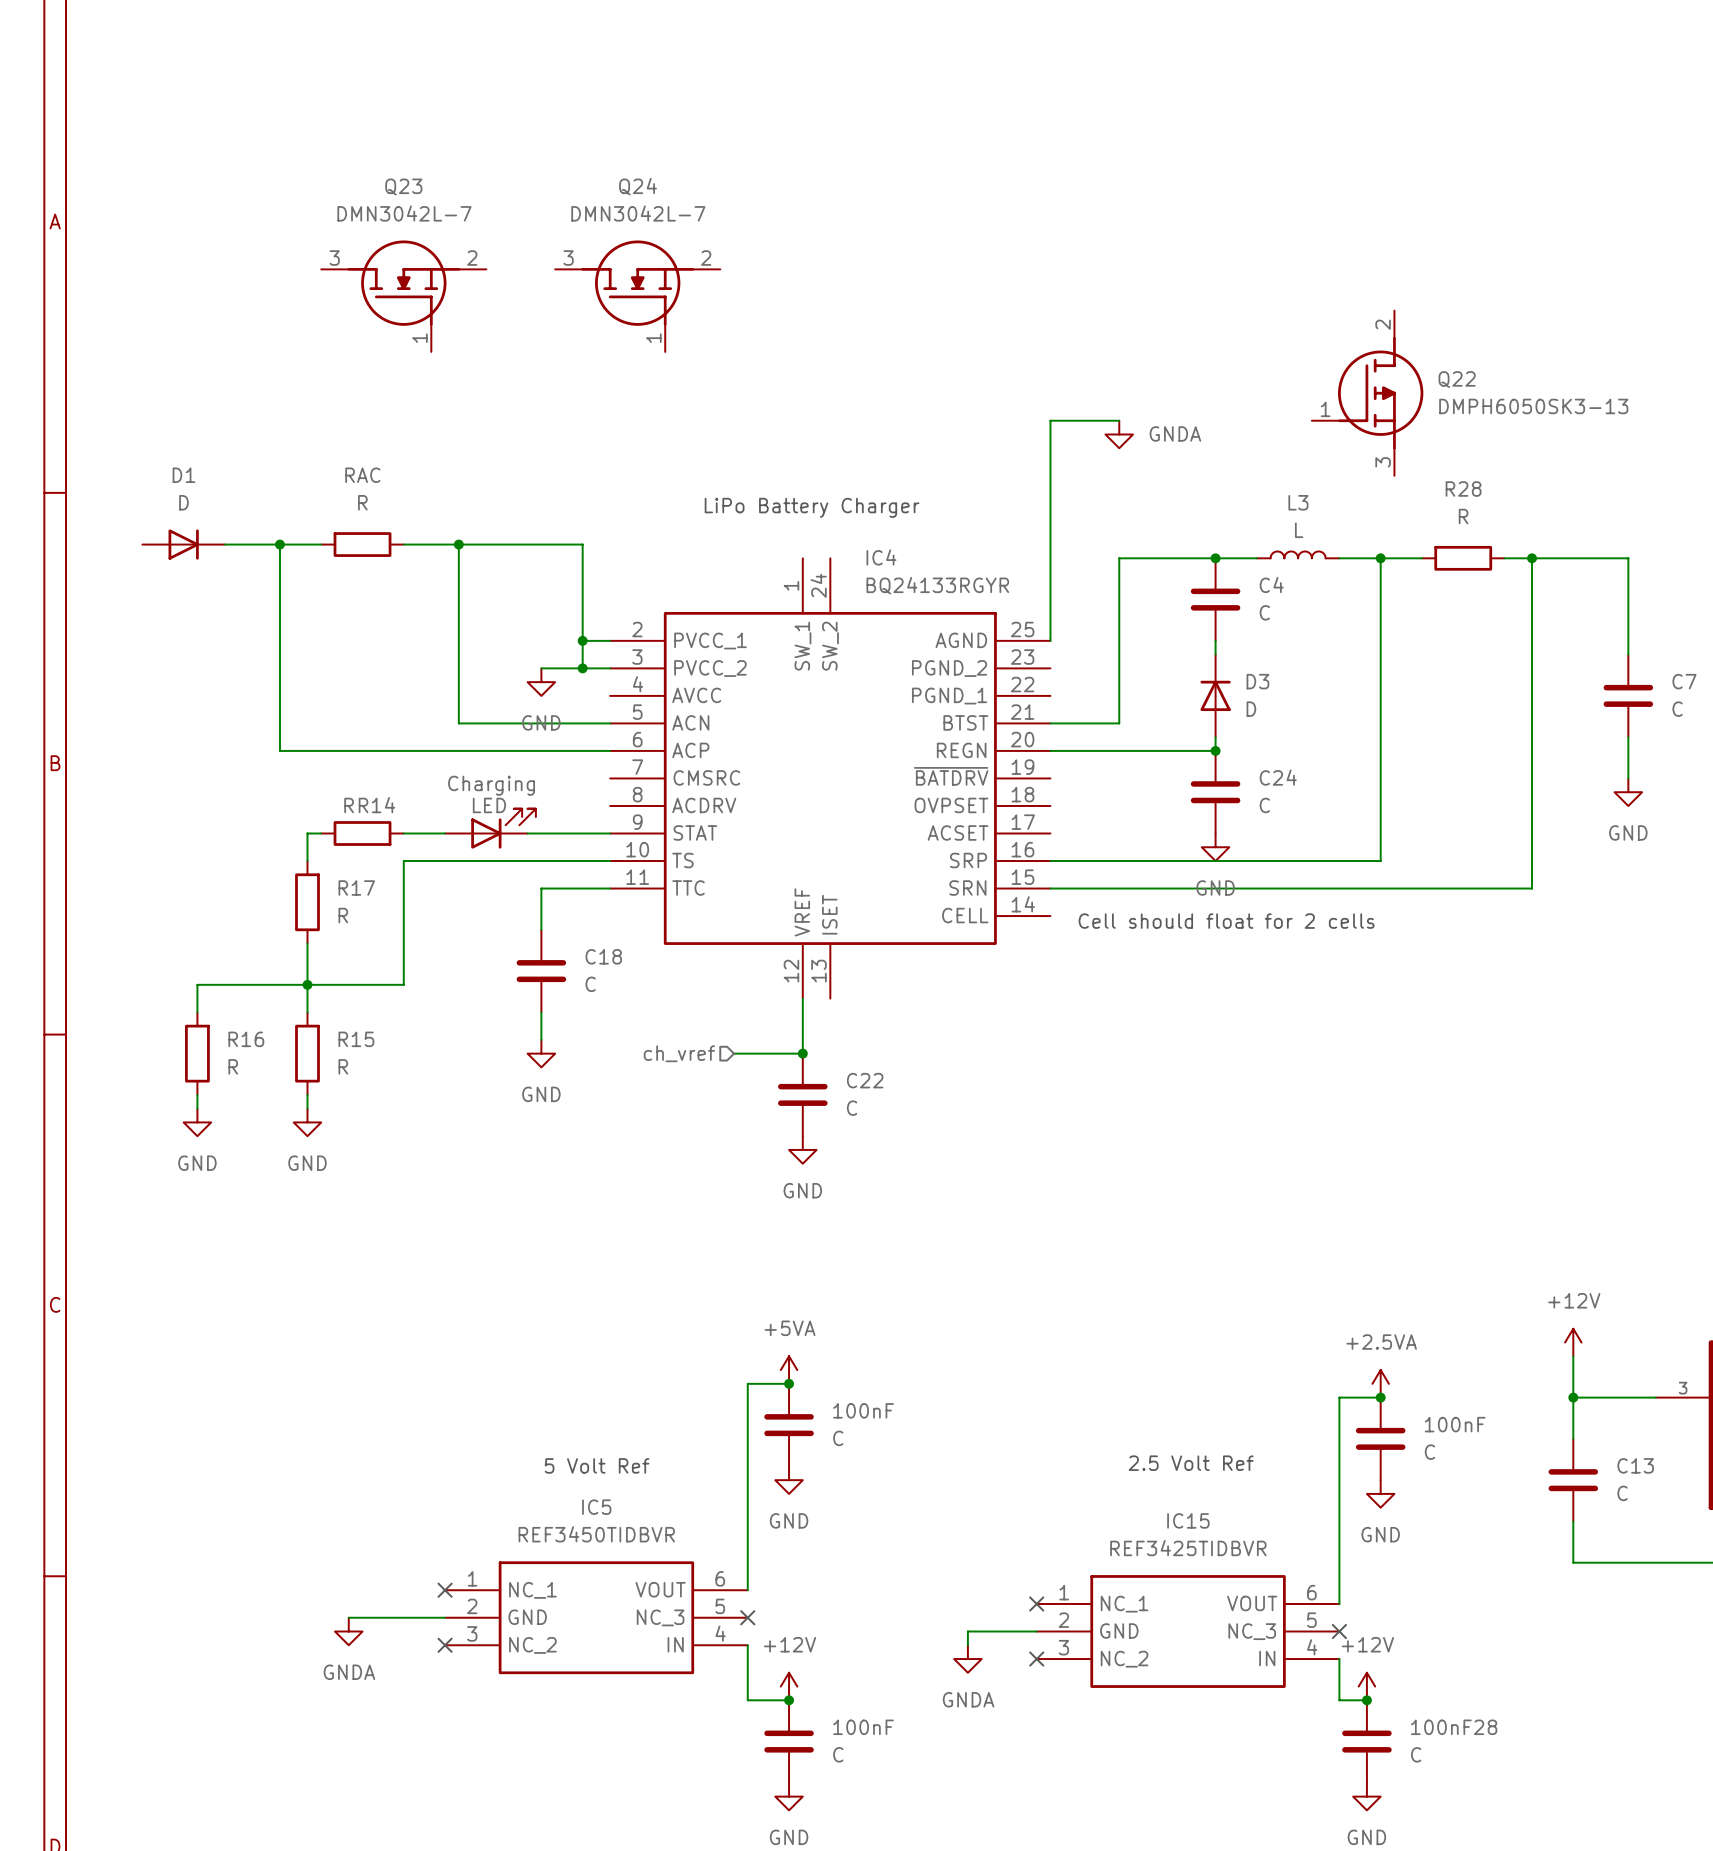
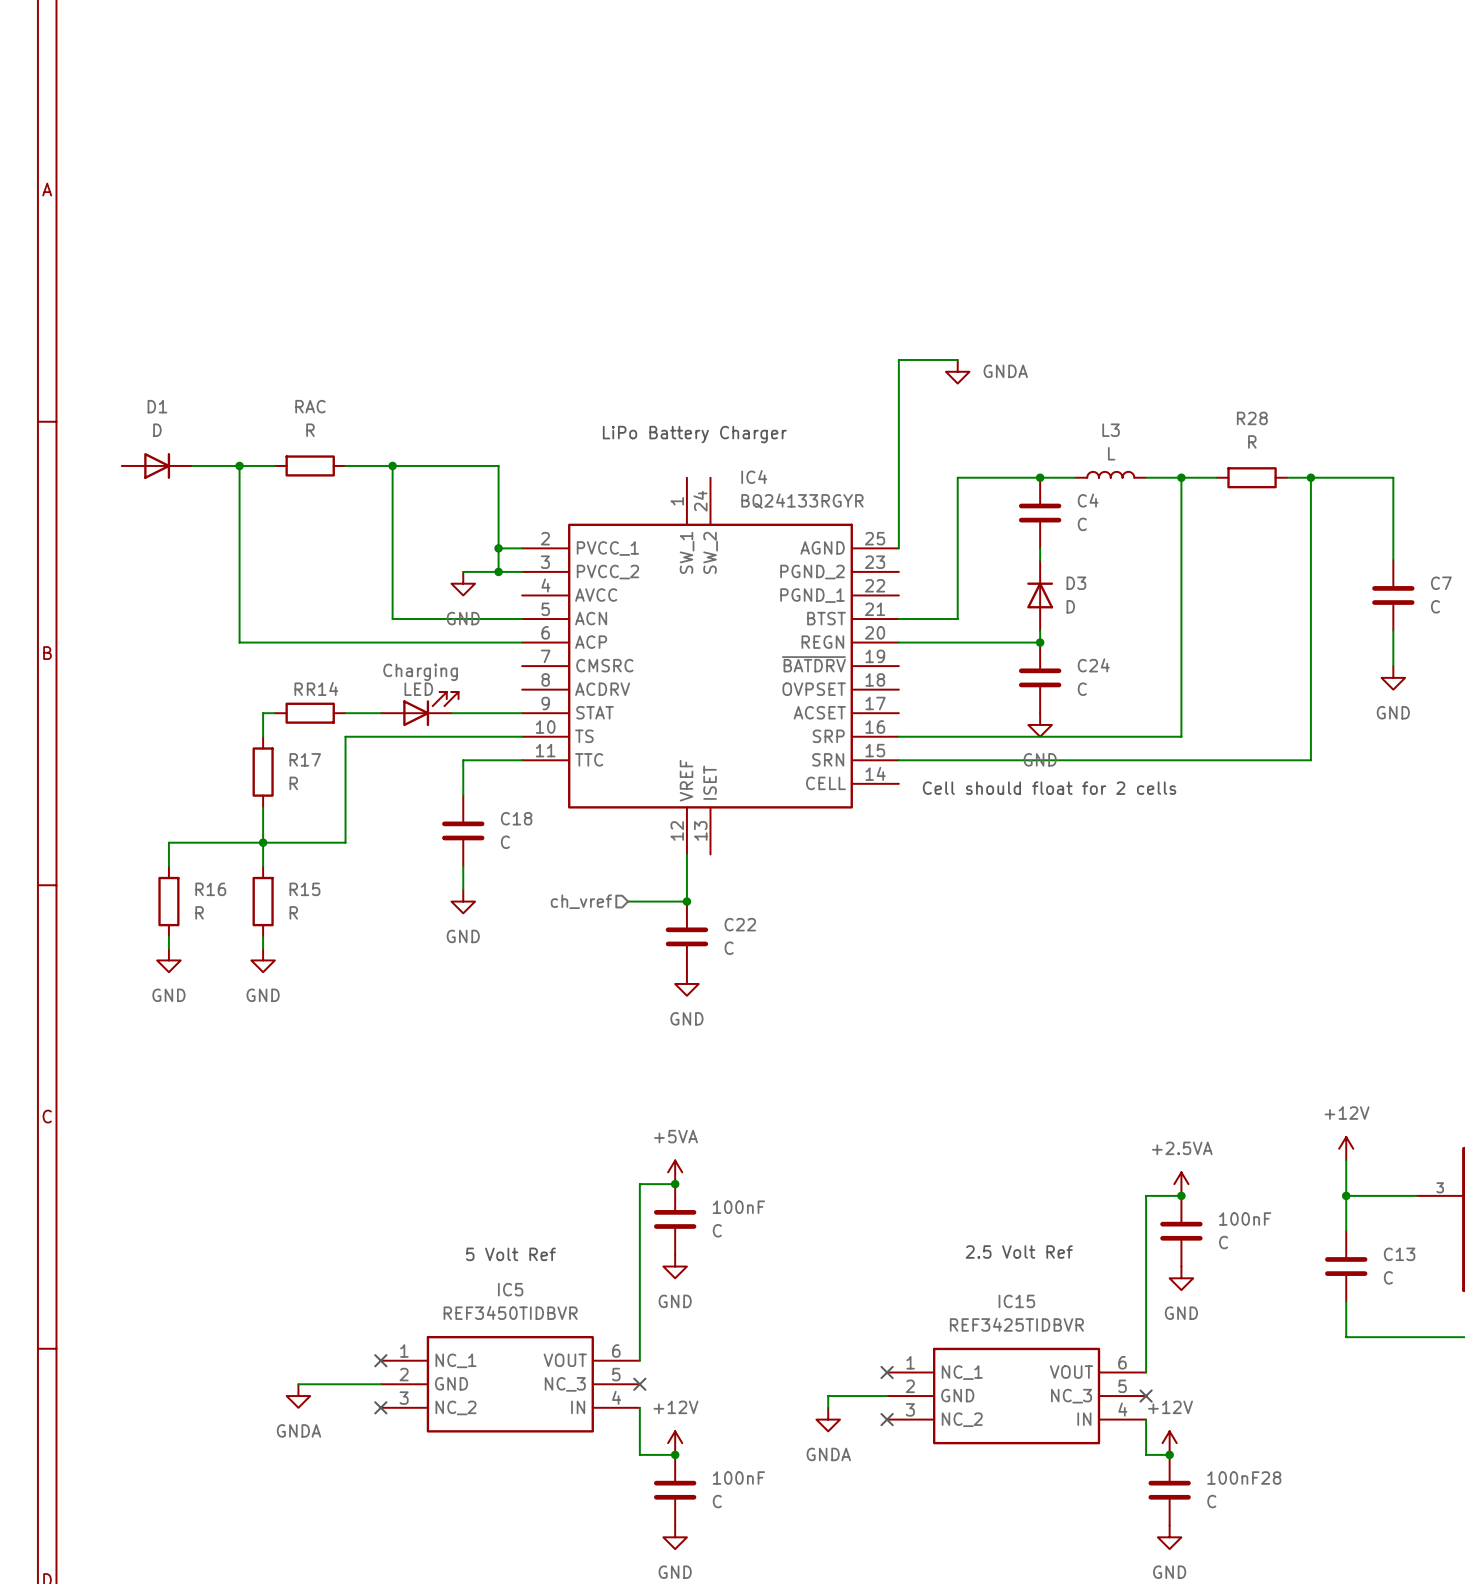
Q23: DMN3042L-7 (403, 296) -> none
Q24: DMN3042L-7 (637, 296) -> none
Q22: DMPH6050SK3-13 (1367, 393) -> none

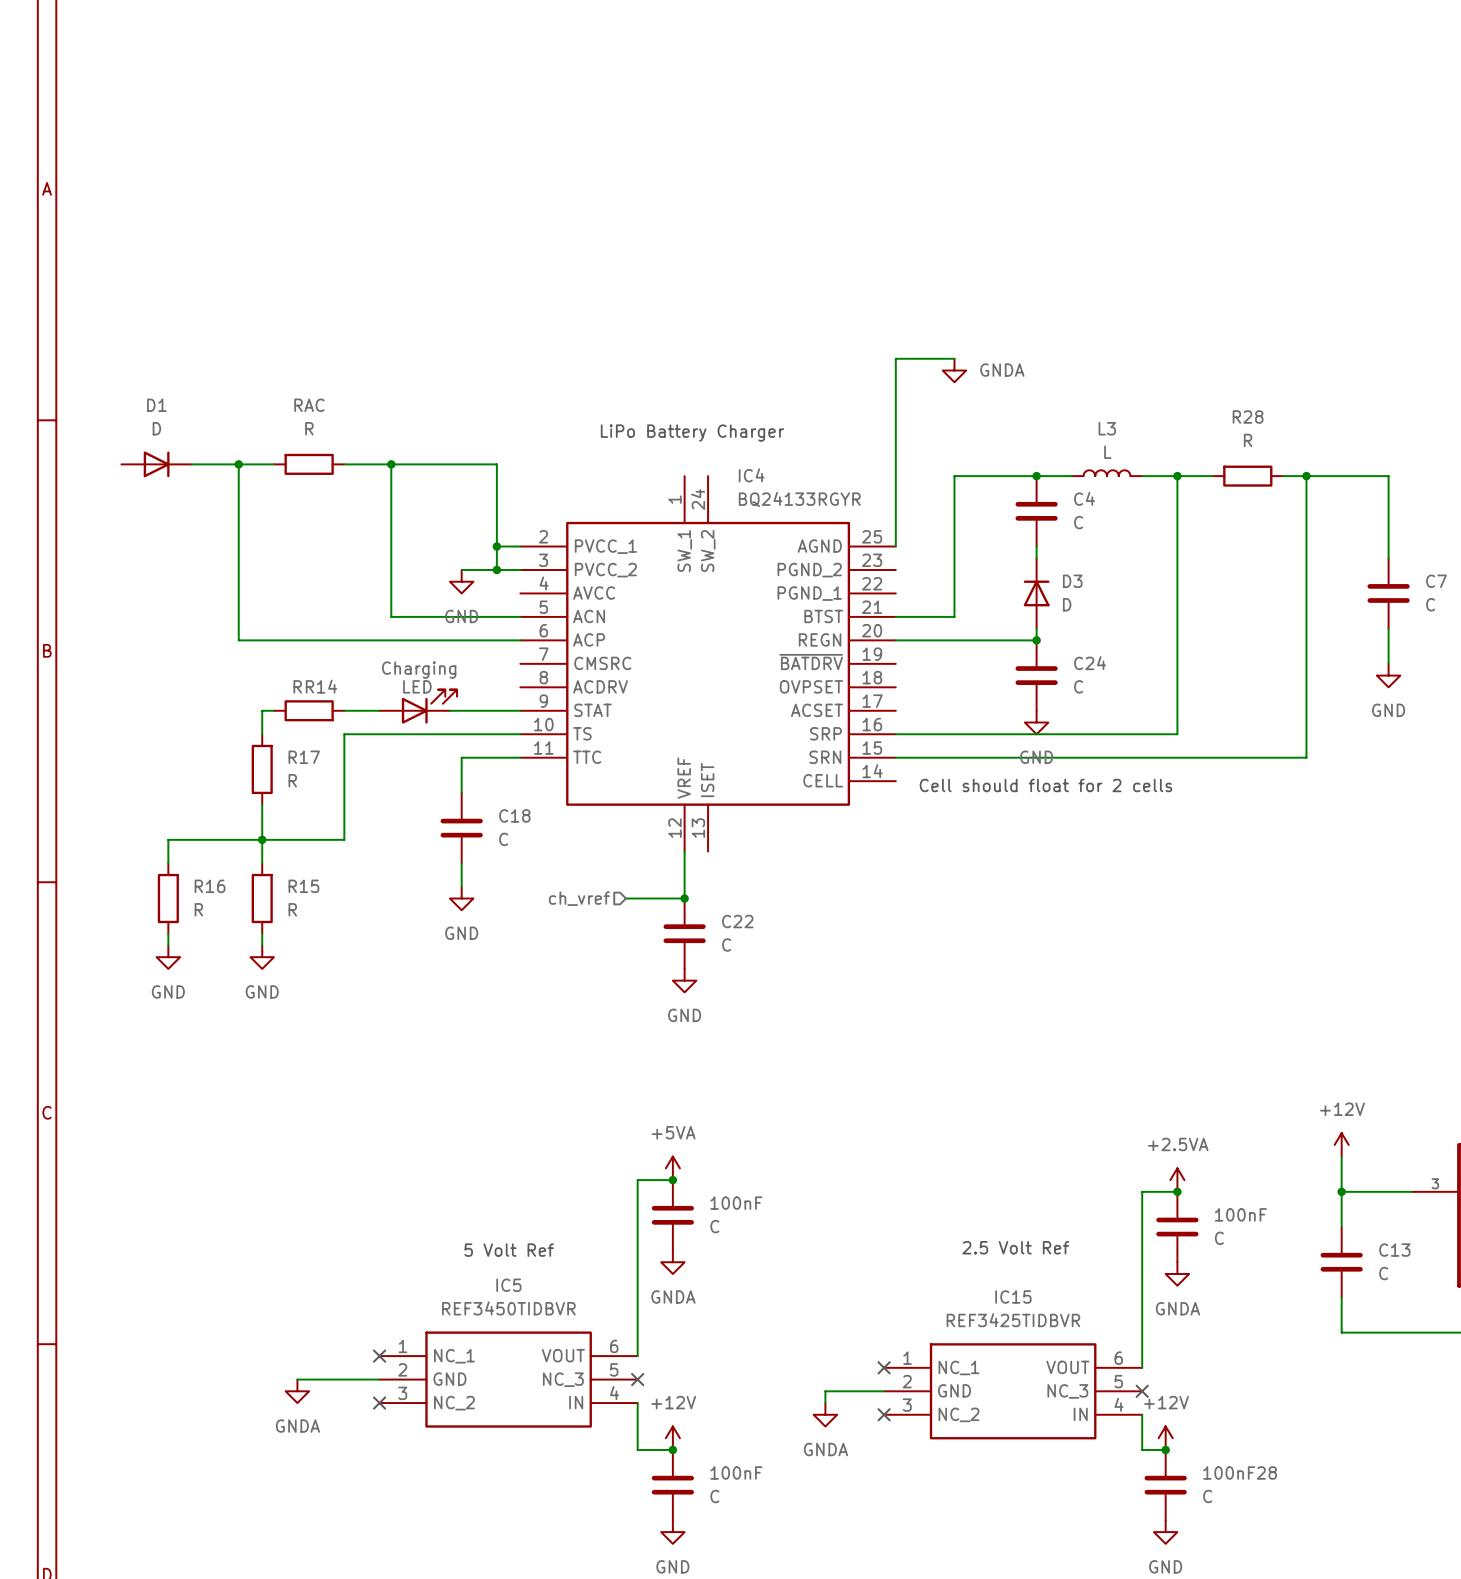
power symbol: GND (675, 1266) -> GNDA (672, 1262)
power symbol: GND (1181, 1278) -> GNDA (1177, 1273)

